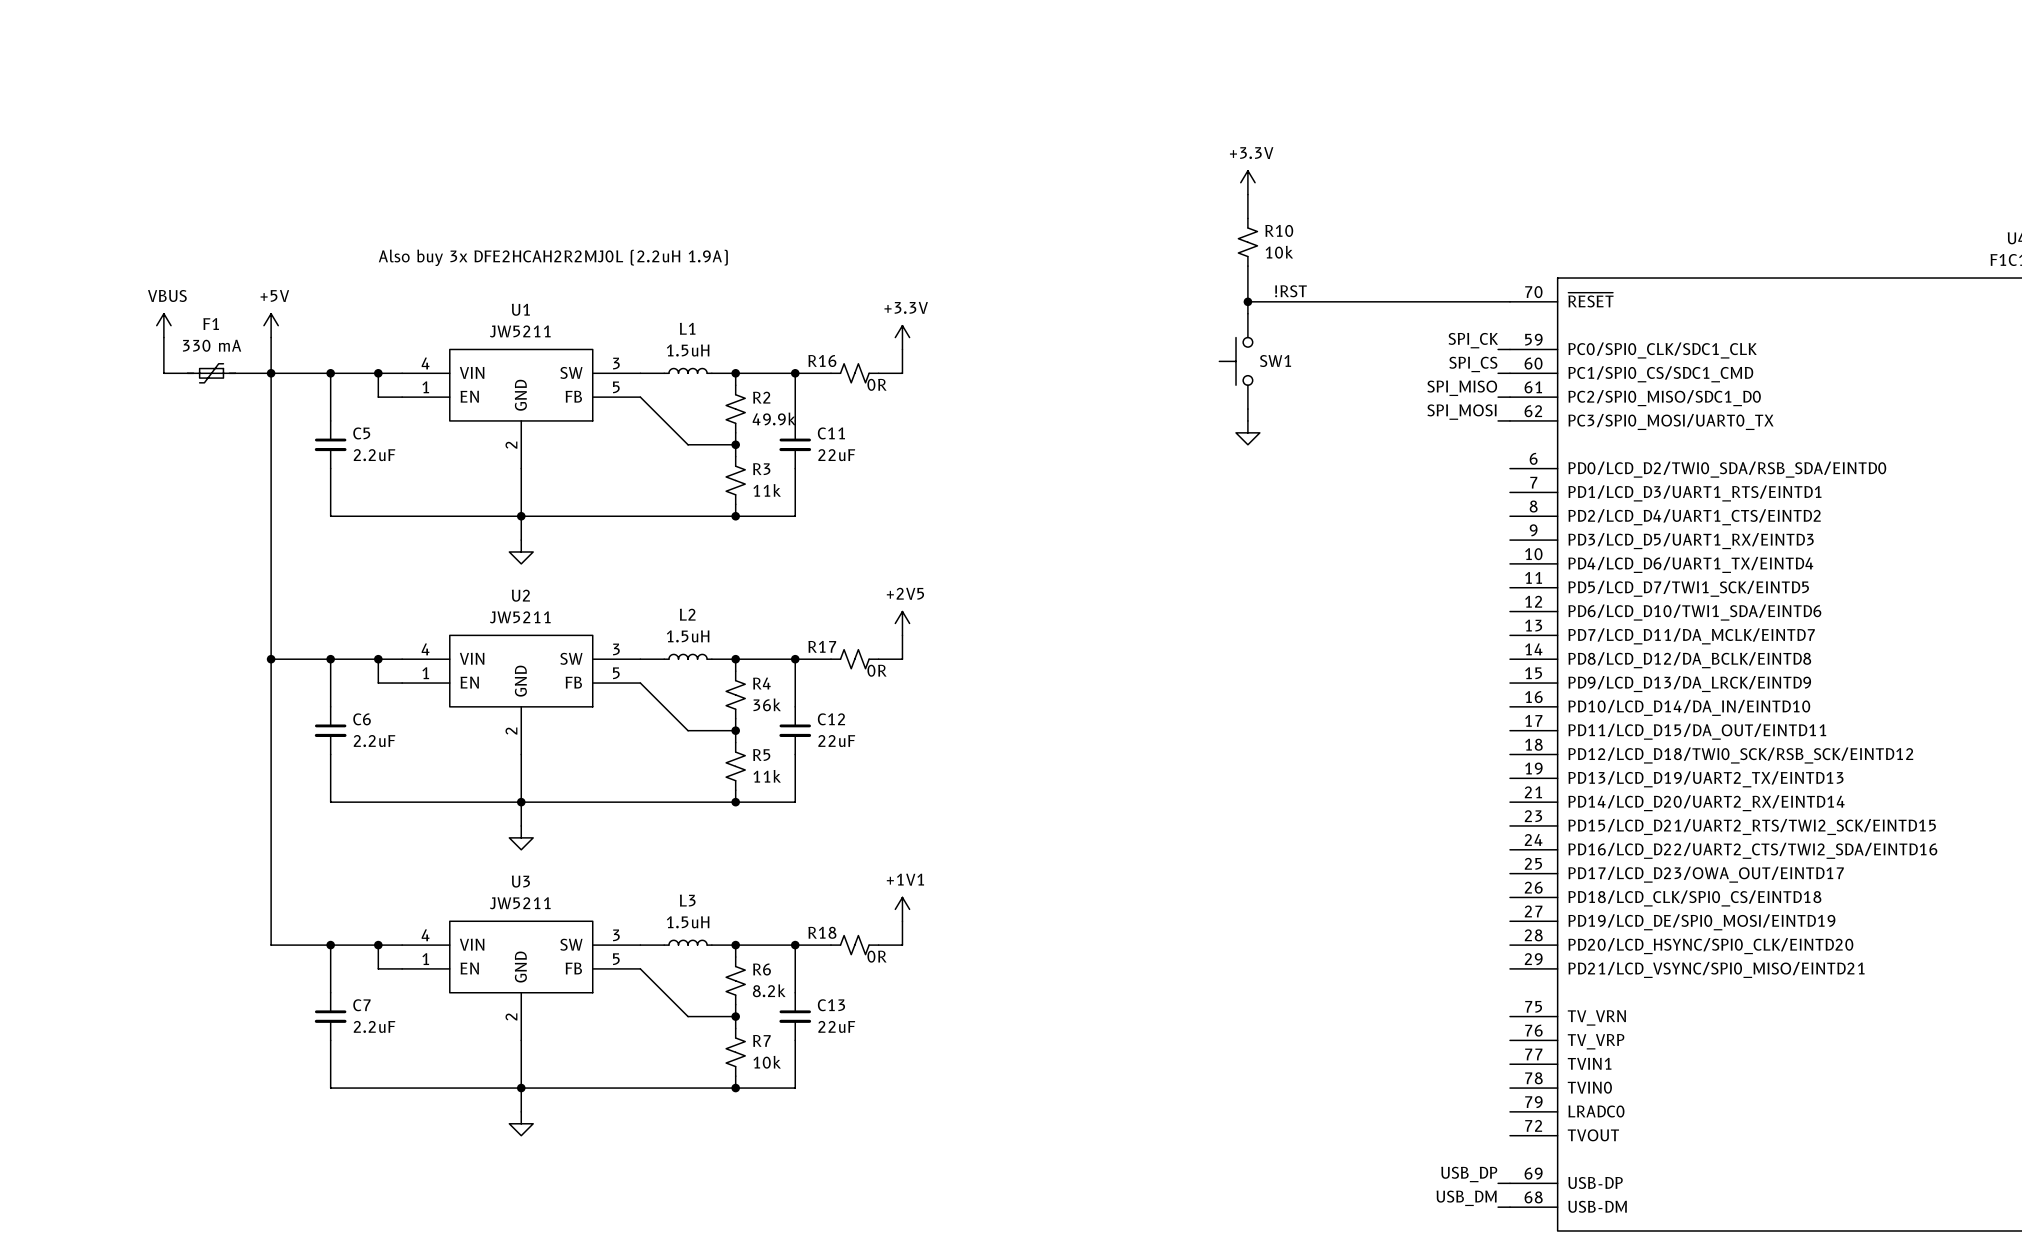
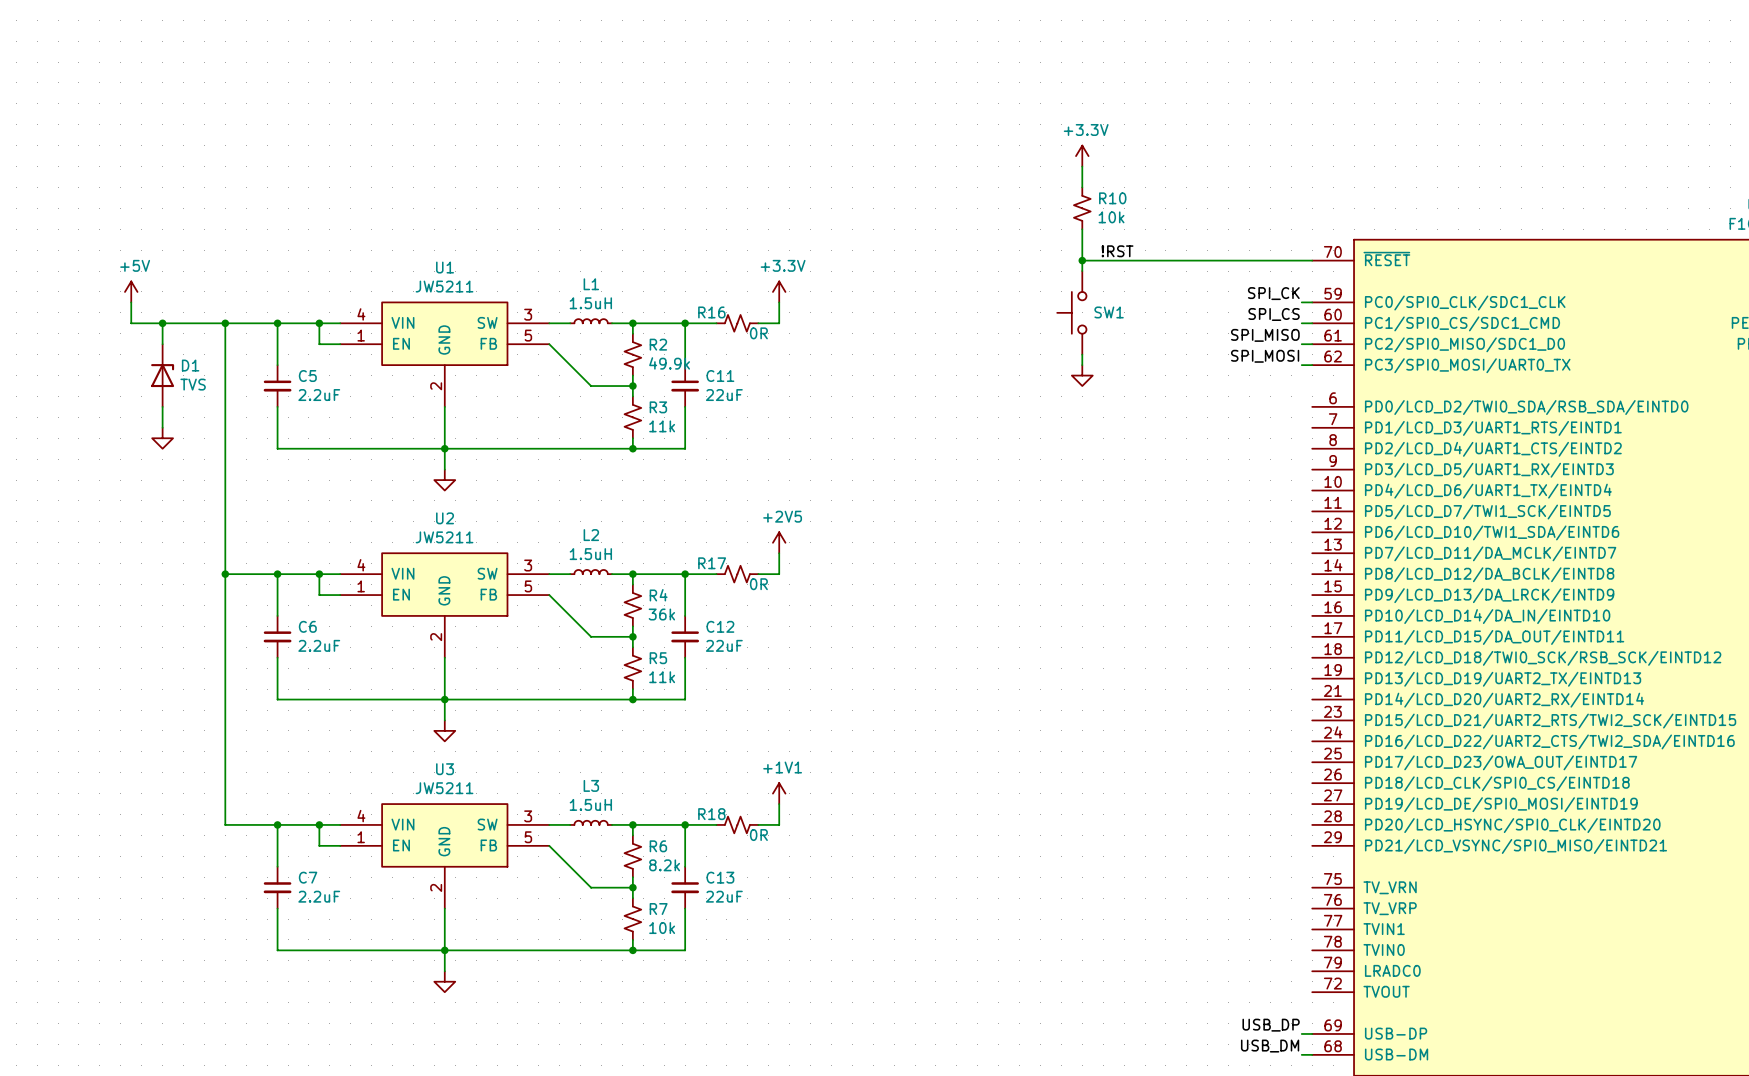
text: Also buy 3x DFE2HCAH2R2MJ0L (2.2uH 1.9A) (553, 257) -> none
power symbol: VBUS (163, 325) -> none
power symbol position: +5V (271, 325) -> +5V (131, 291)
wire: (271, 337) (271, 373) -> none
wire: none -> (162, 323) (162, 344)
junction: none -> (162, 323)
F1: 330 mA (211, 373) -> none
D1: none -> TVS (162, 375)
wire: none -> (162, 406) (162, 427)
power symbol: none -> (162, 438)

